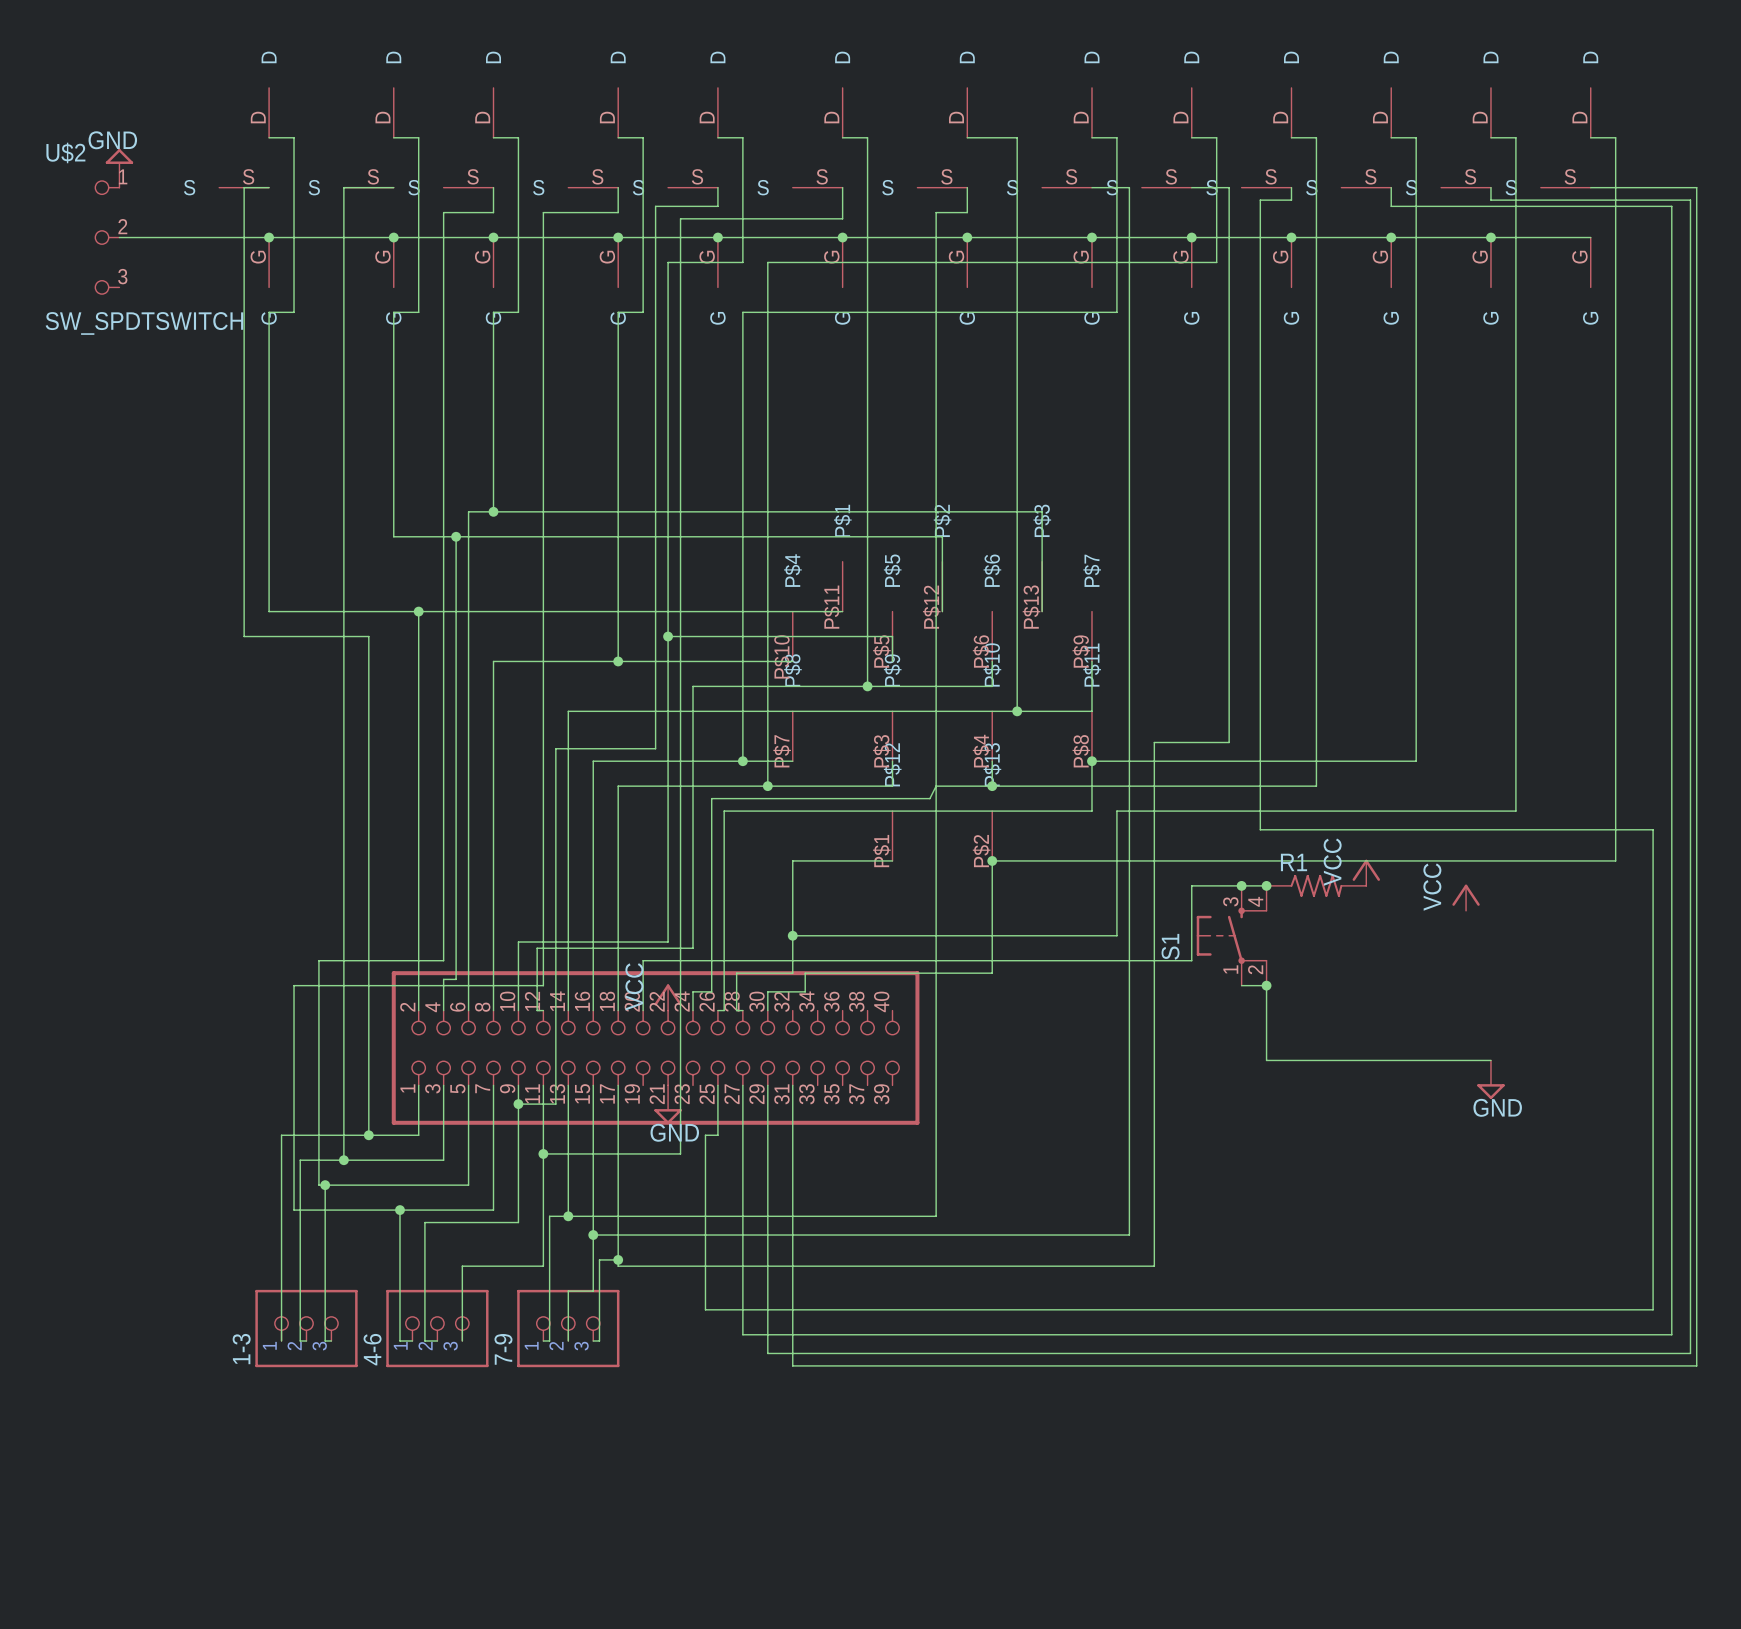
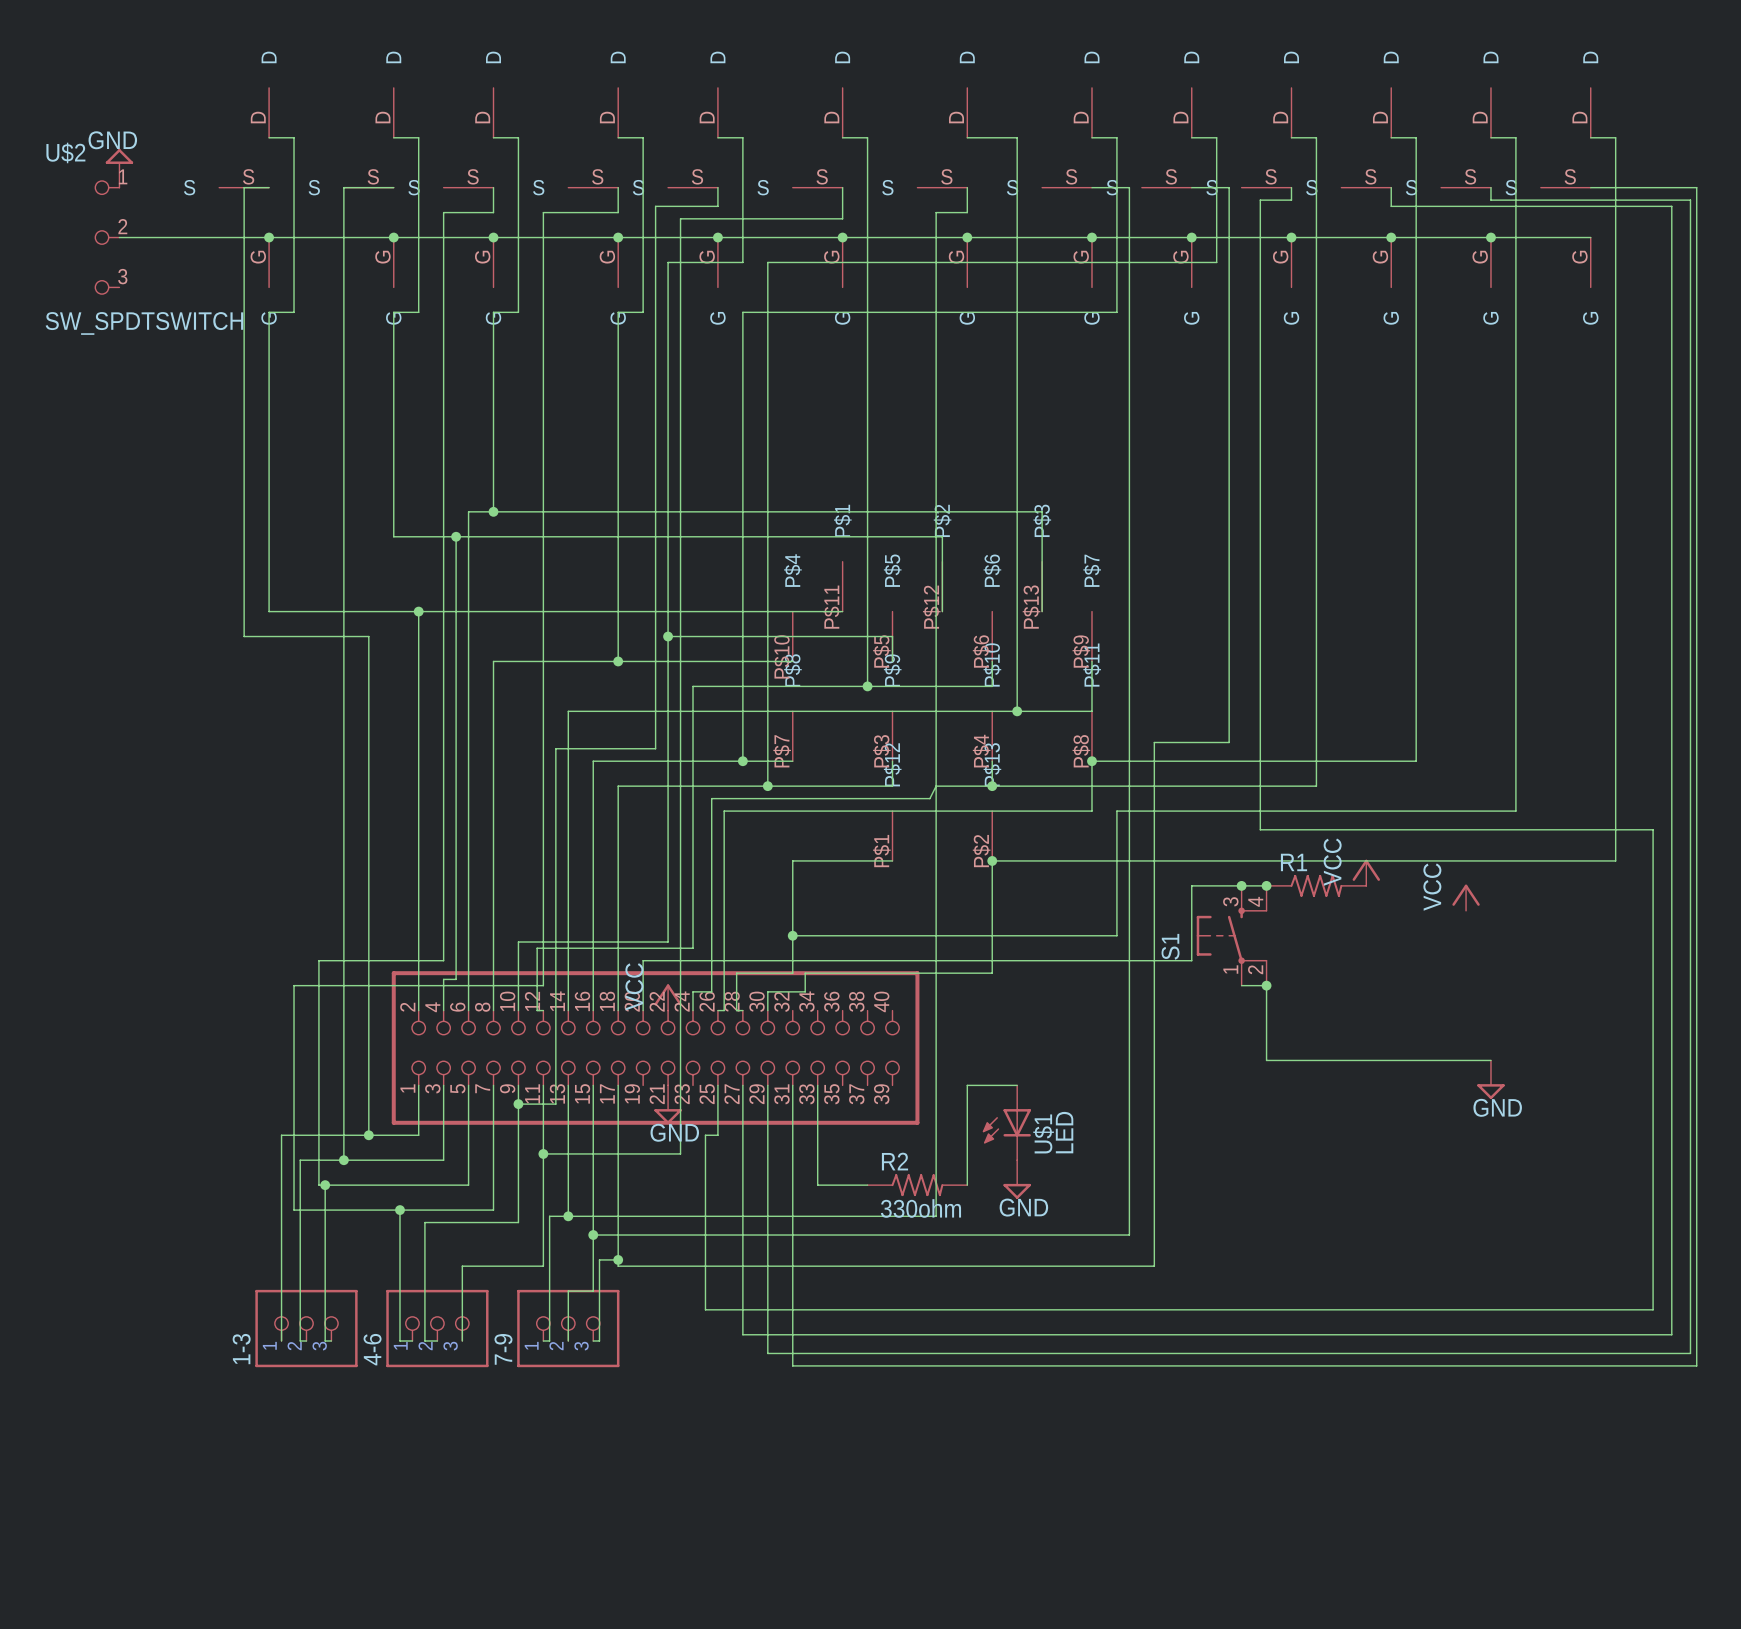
wire: none -> (817, 1085) (817, 1185) (867, 1185)
wire: none -> (1017, 1085) (967, 1085) (967, 1185)
U$1: none -> LED (1006, 1122)
power symbol: none -> GND (1017, 1179)
R2: none -> 330ohm (917, 1185)

